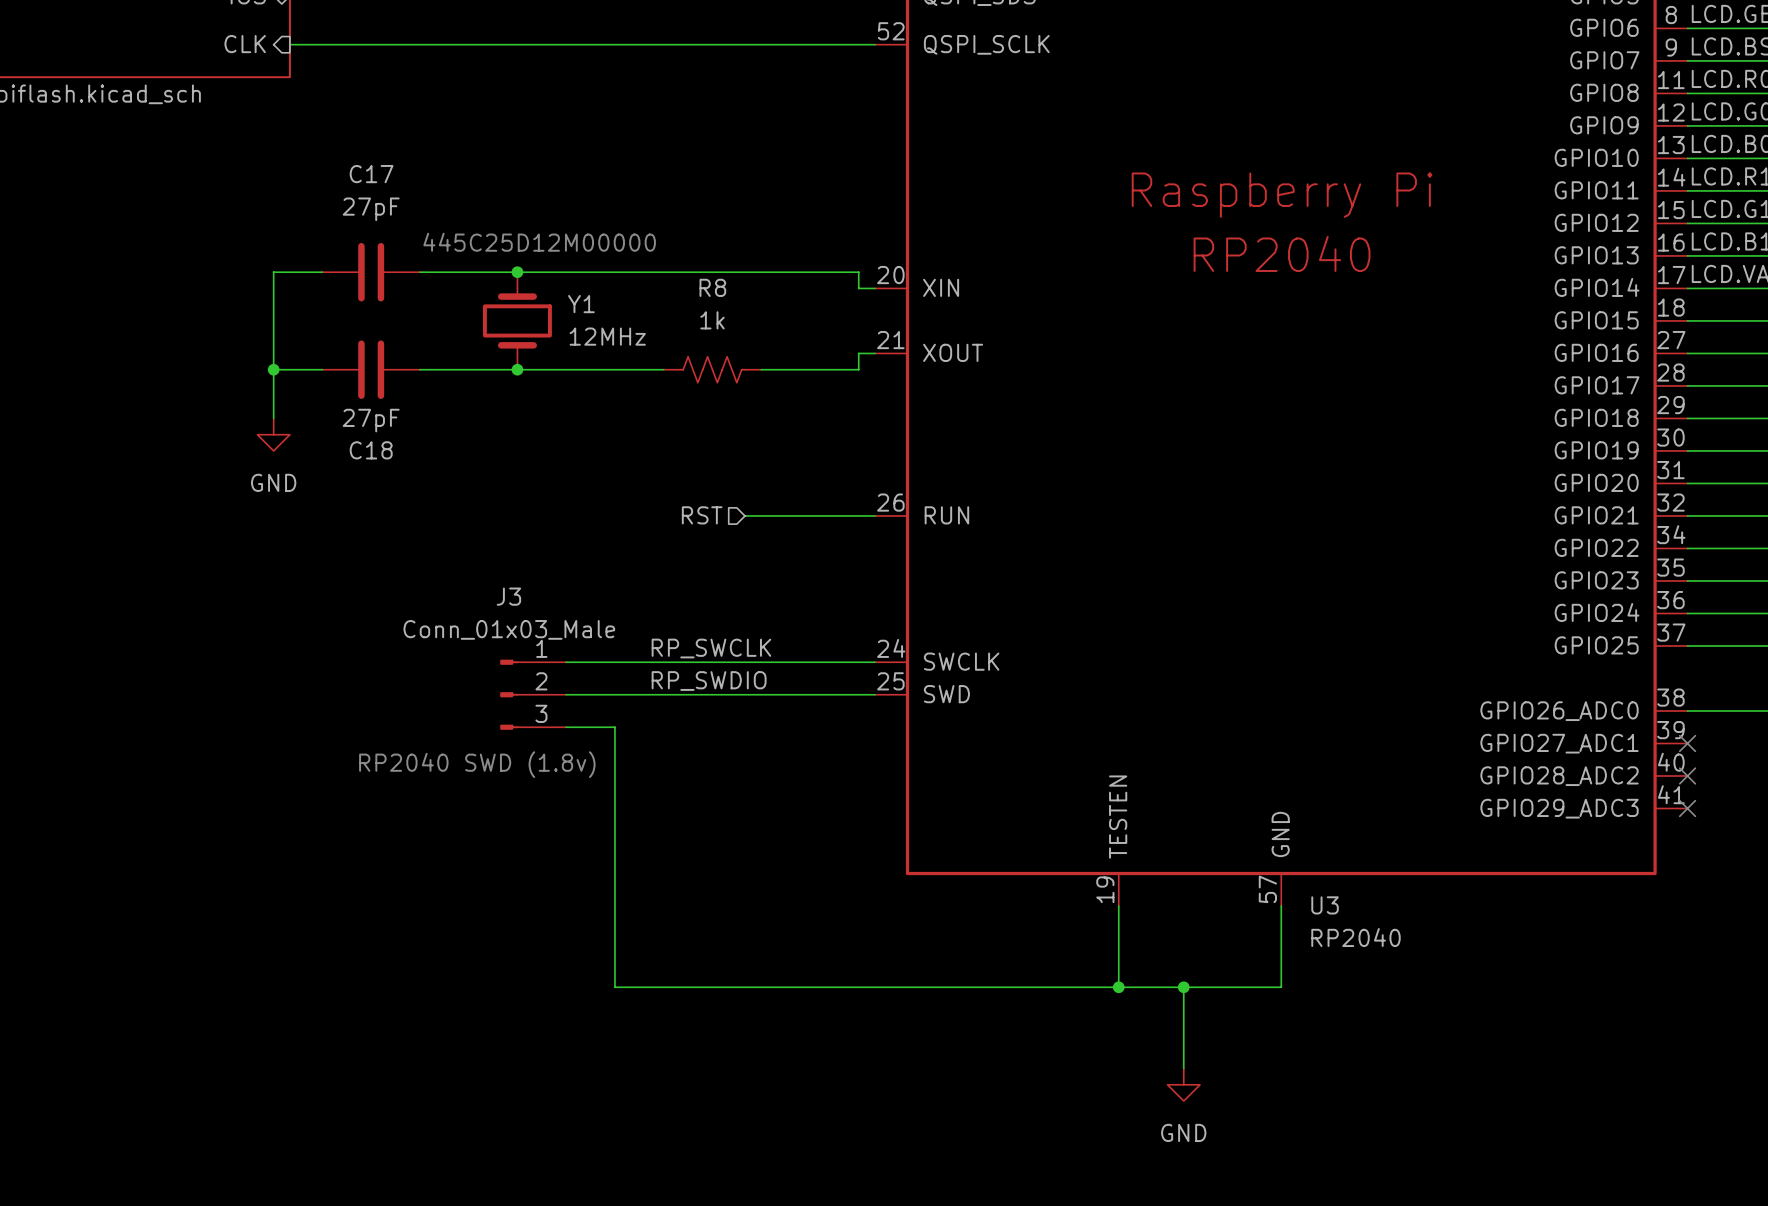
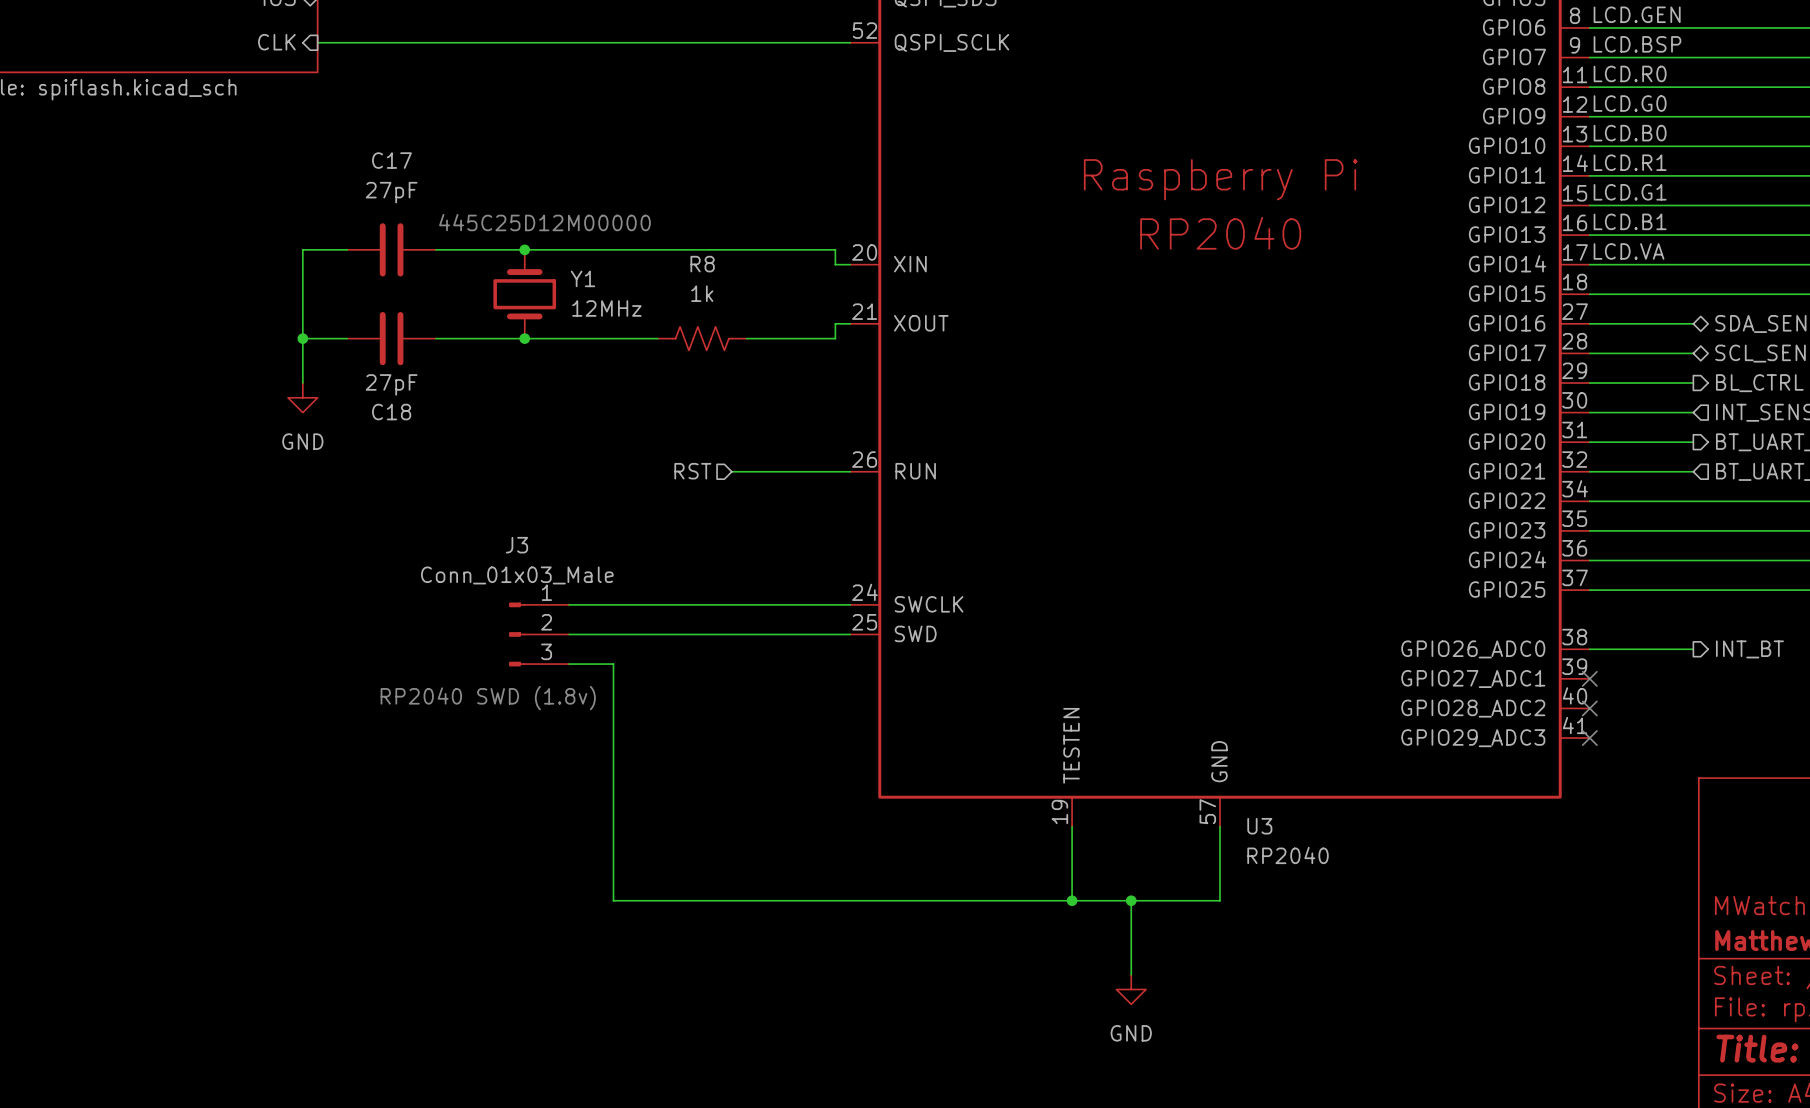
label: RP_SWCLK (711, 648) -> none
label: RP_SWDIO (709, 681) -> none

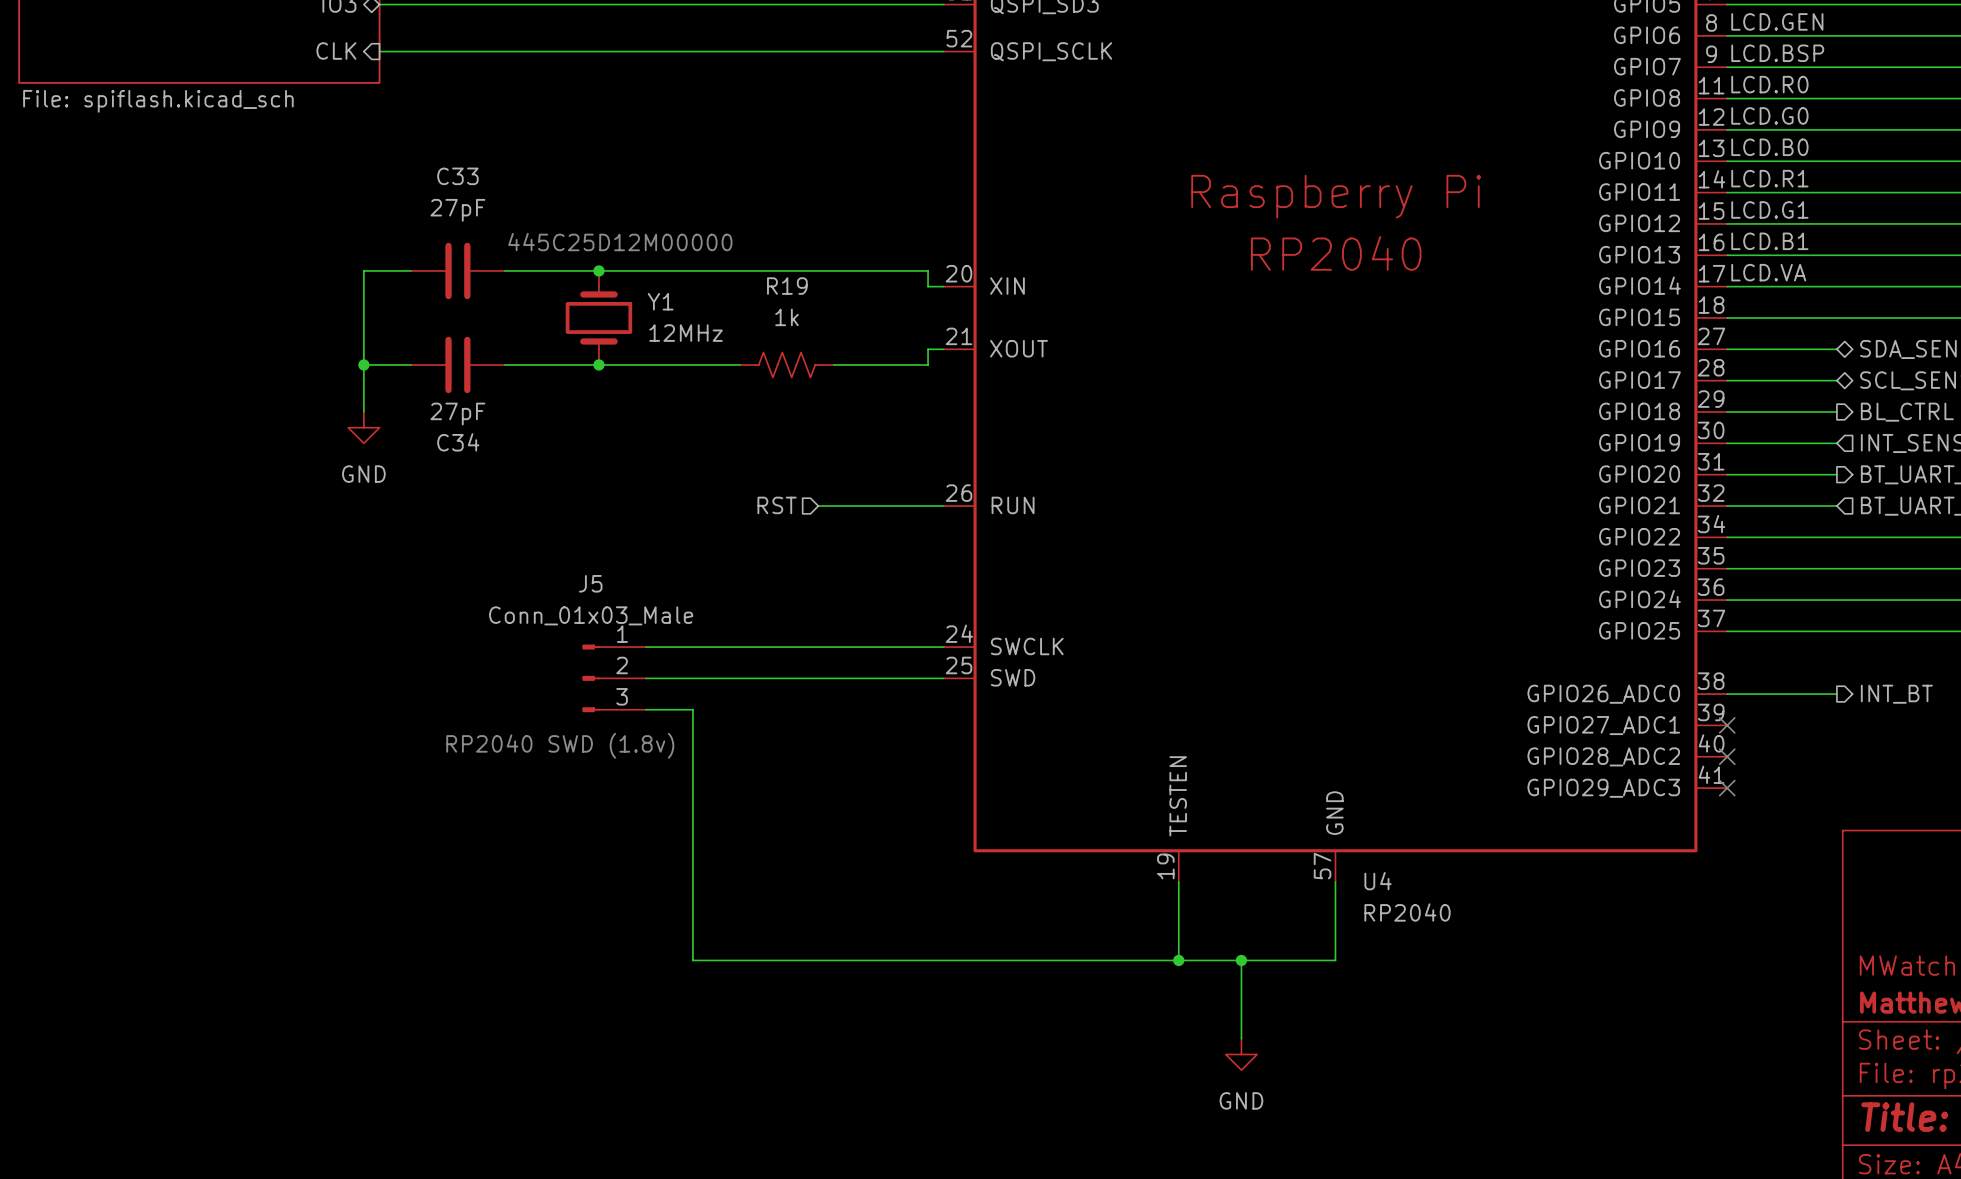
C17 name: C17 (391, 160) -> C33 (457, 176)
R8 name: R8 (702, 264) -> R19 (787, 286)
C18 name: C18 (391, 412) -> C34 (458, 442)
J3 name: J3 (516, 545) -> J5 (590, 583)
U3 name: U3 (1259, 826) -> U4 (1378, 881)

